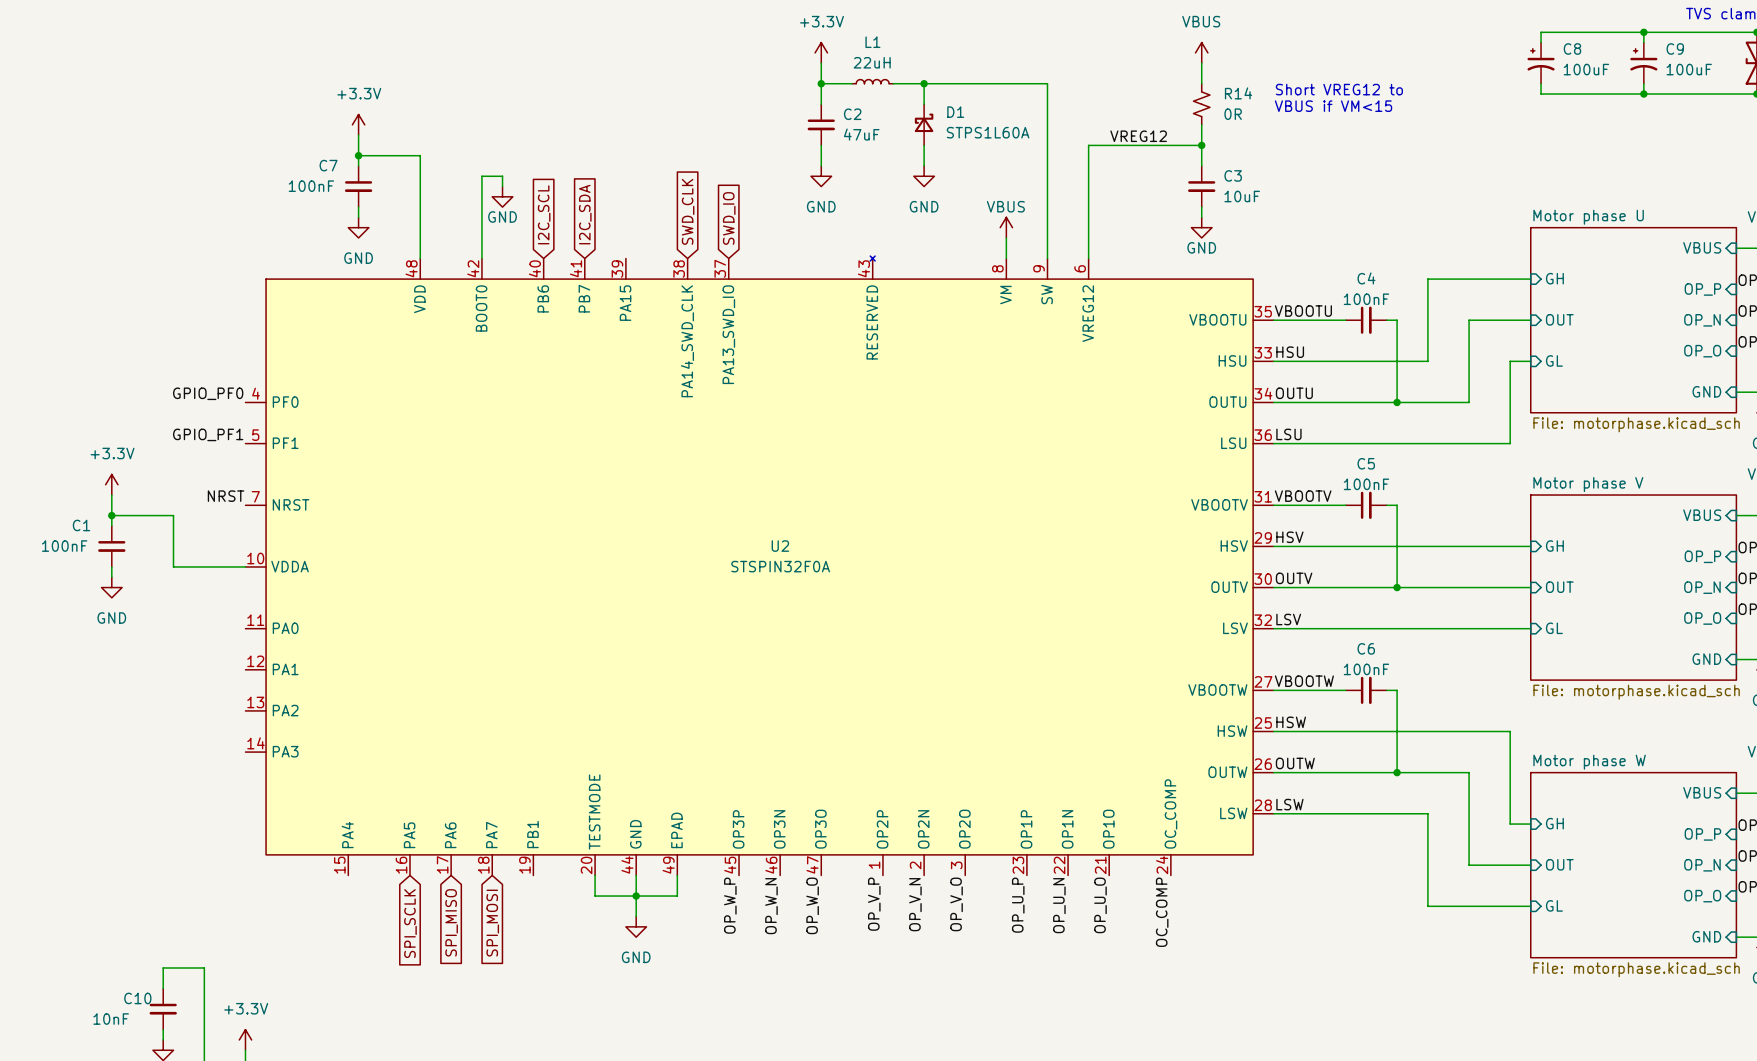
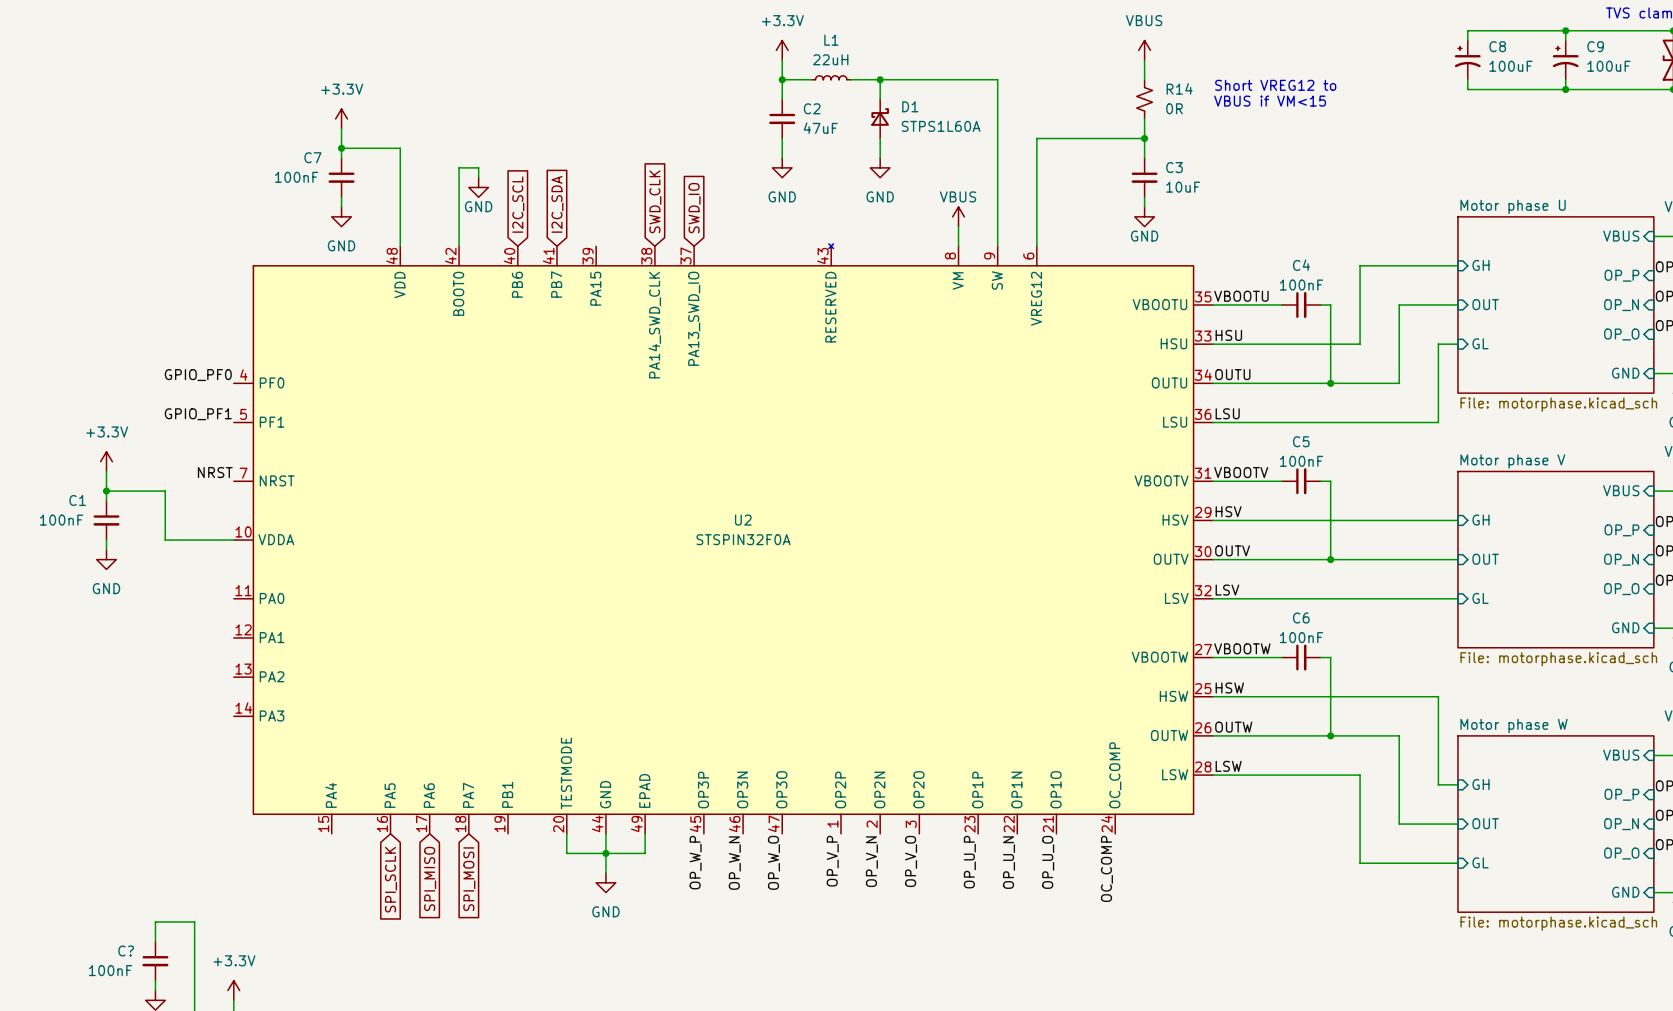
label: VREG12 (1138, 136) -> none
C10 name: C10 (137, 998) -> C? (126, 950)
C10 value: 10nF (111, 1019) -> 100nF (110, 970)

